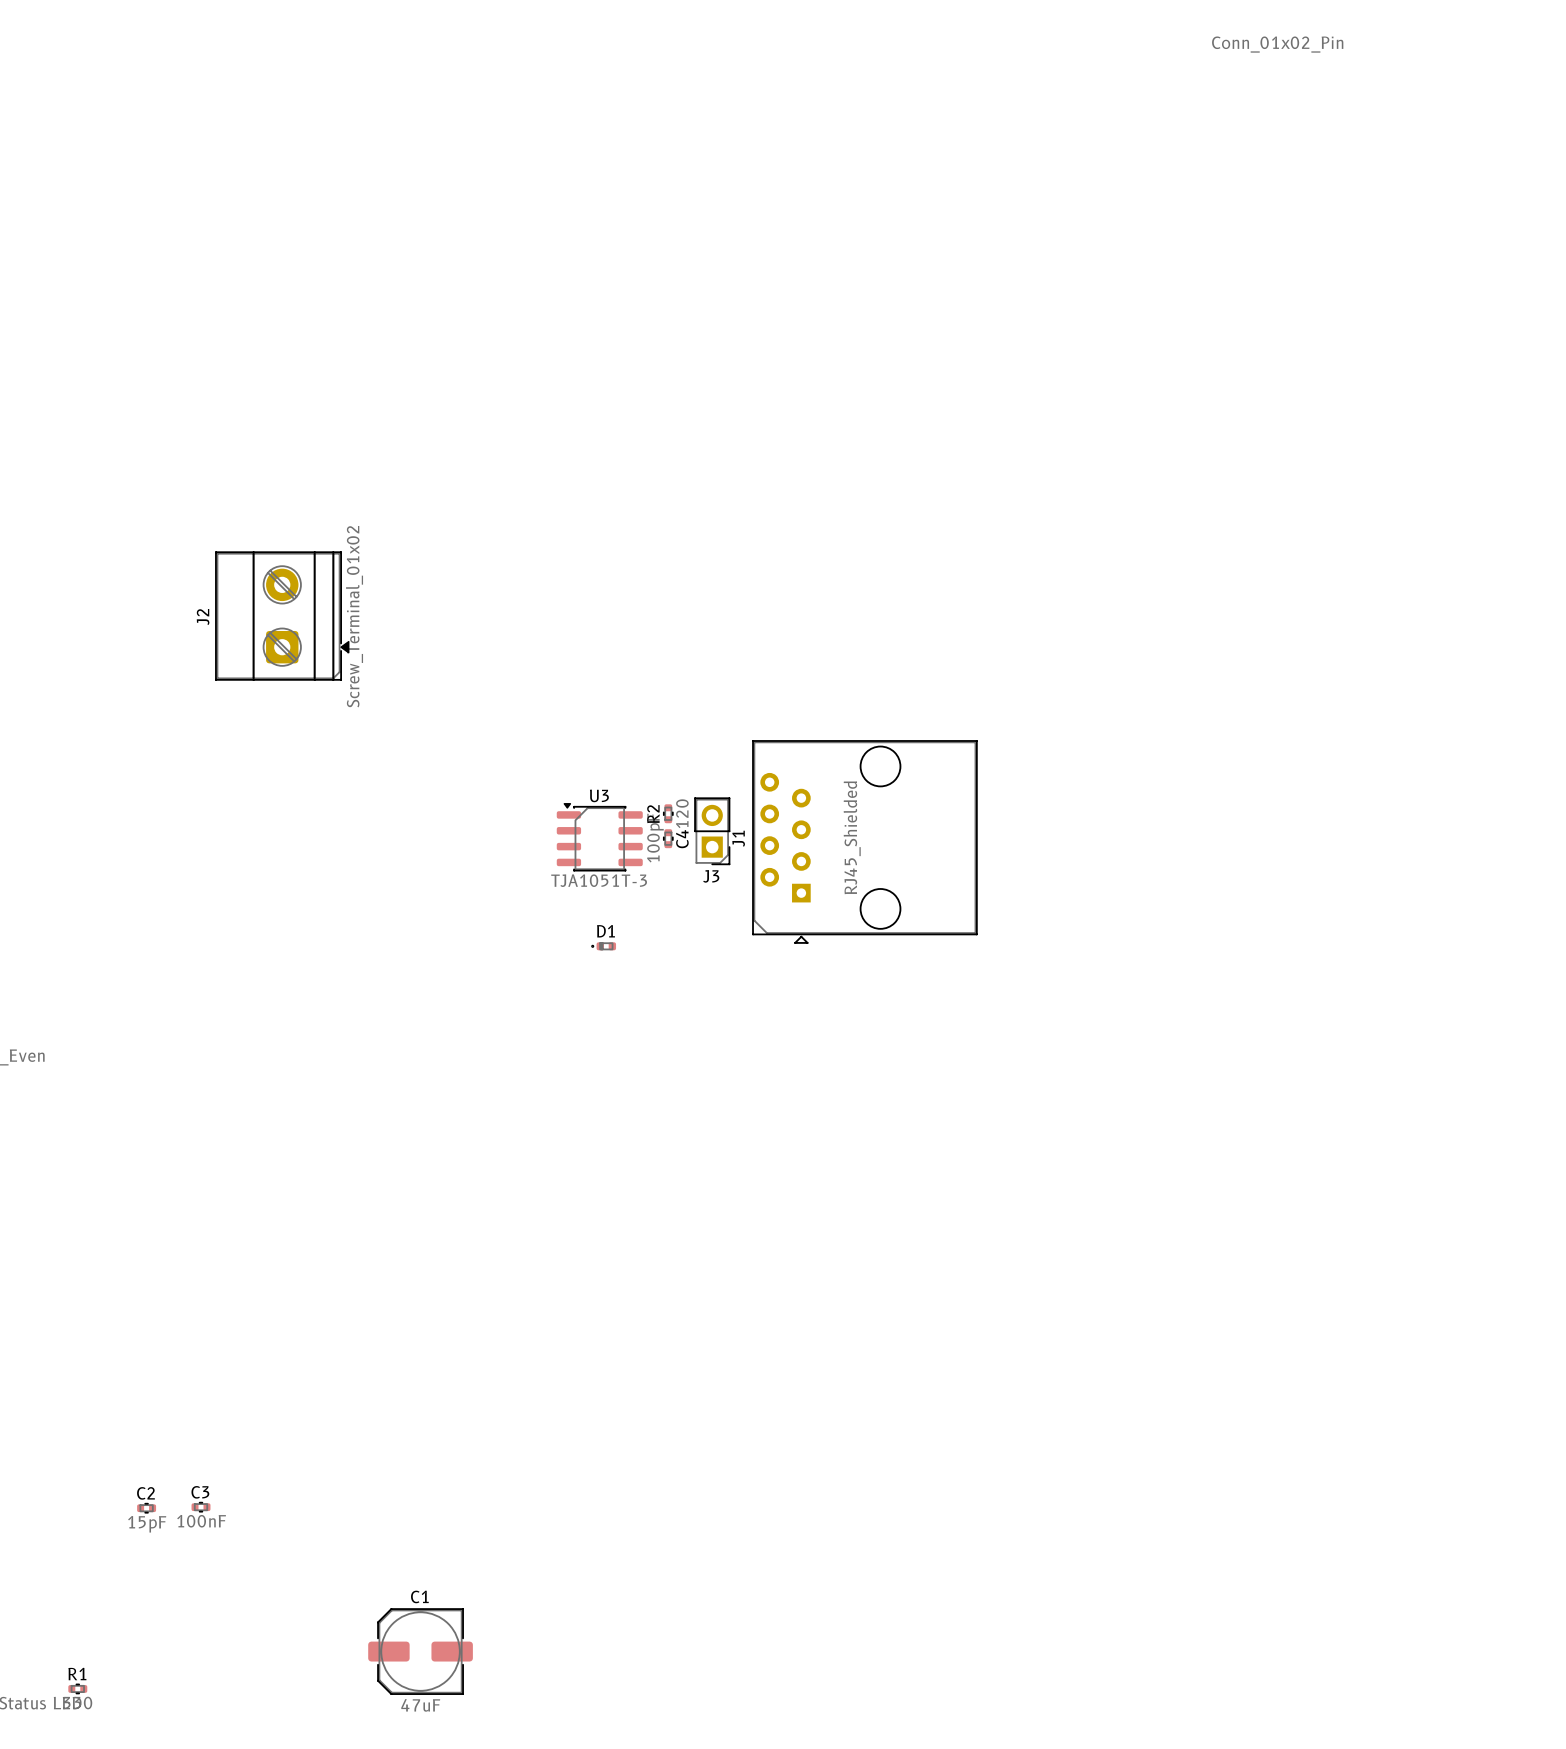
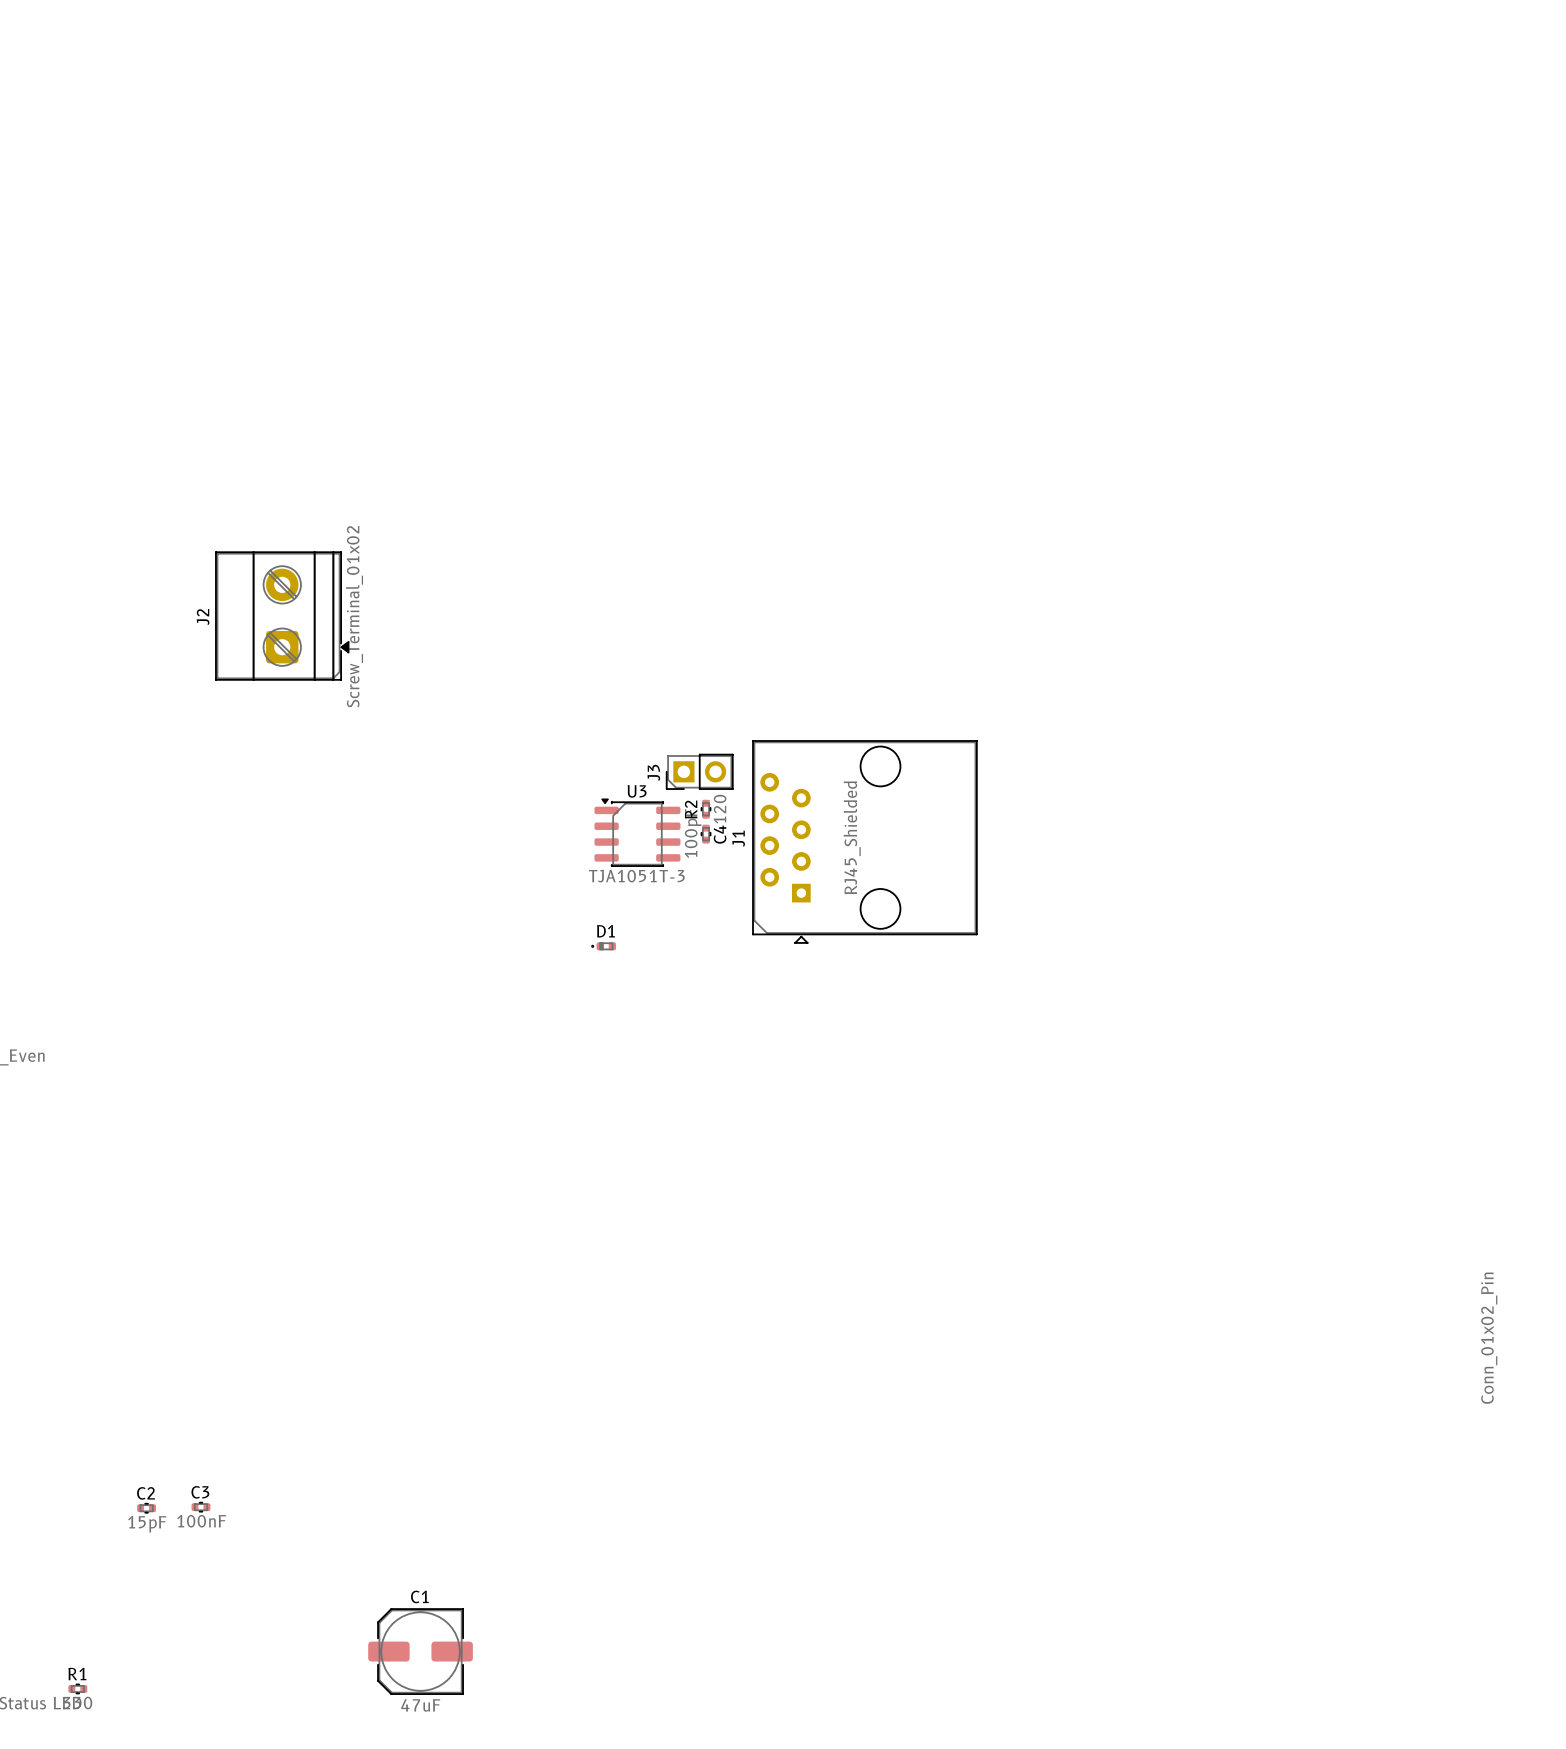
R2 position: (668, 813) -> (706, 809)
J3 rotation: 0° (712, 831) -> 90° clockwise (699, 771)
J3 position: (712, 831) -> (699, 771)
U3 position: (599, 837) -> (637, 832)
C4 position: (668, 838) -> (706, 834)

